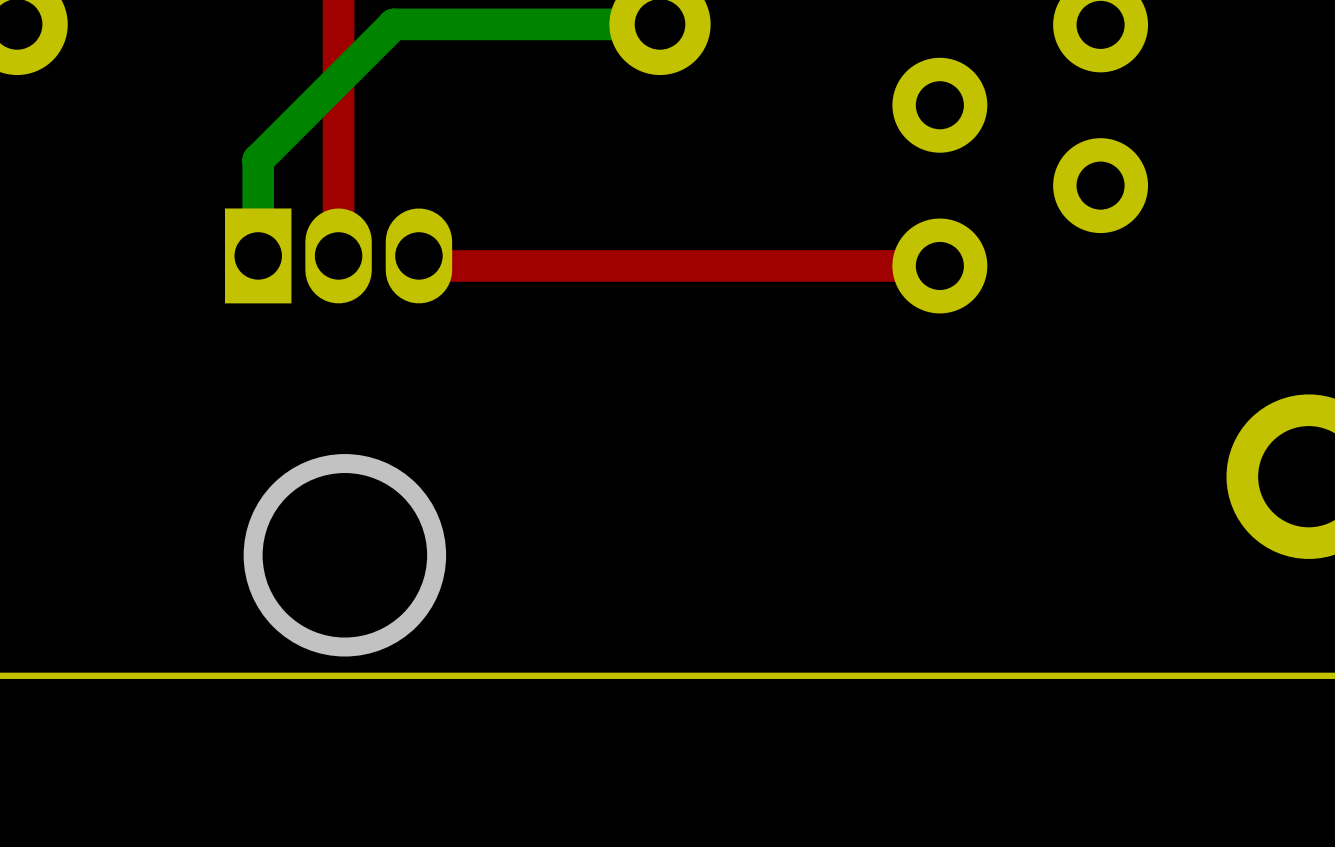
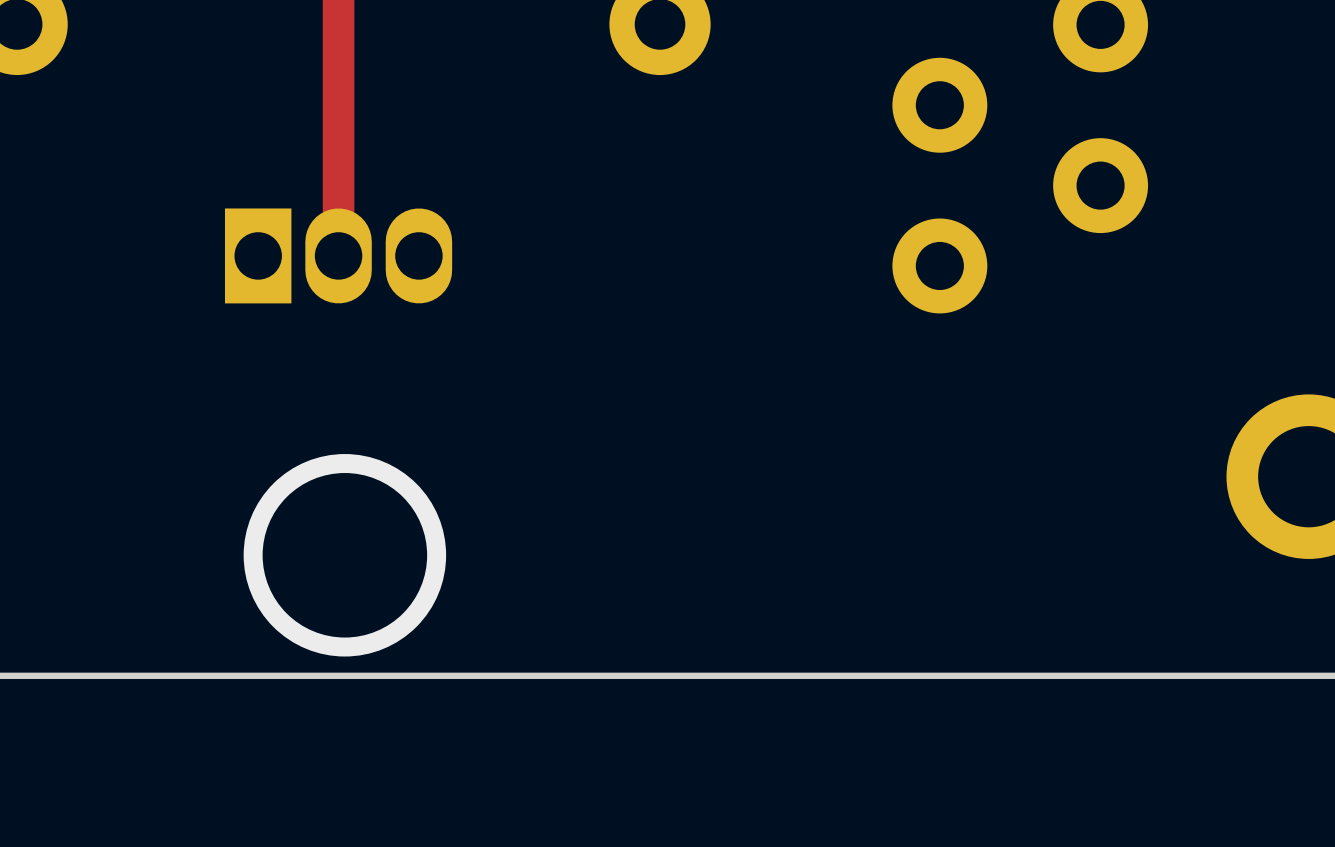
bottom track: (660, 24) (393, 24) (258, 160) (258, 255) -> none
top track: (418, 255) (428, 265) (939, 265) -> none

